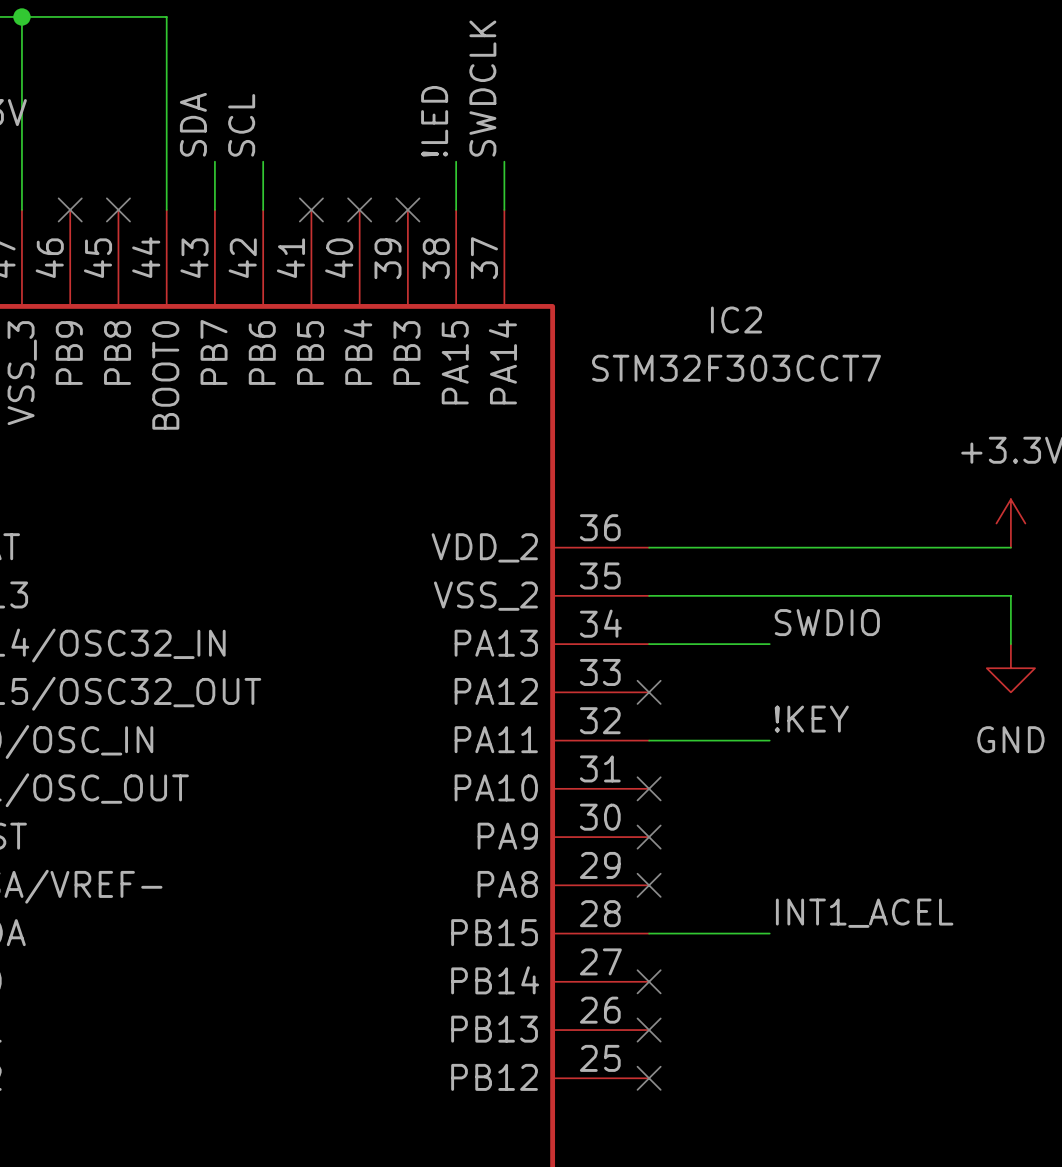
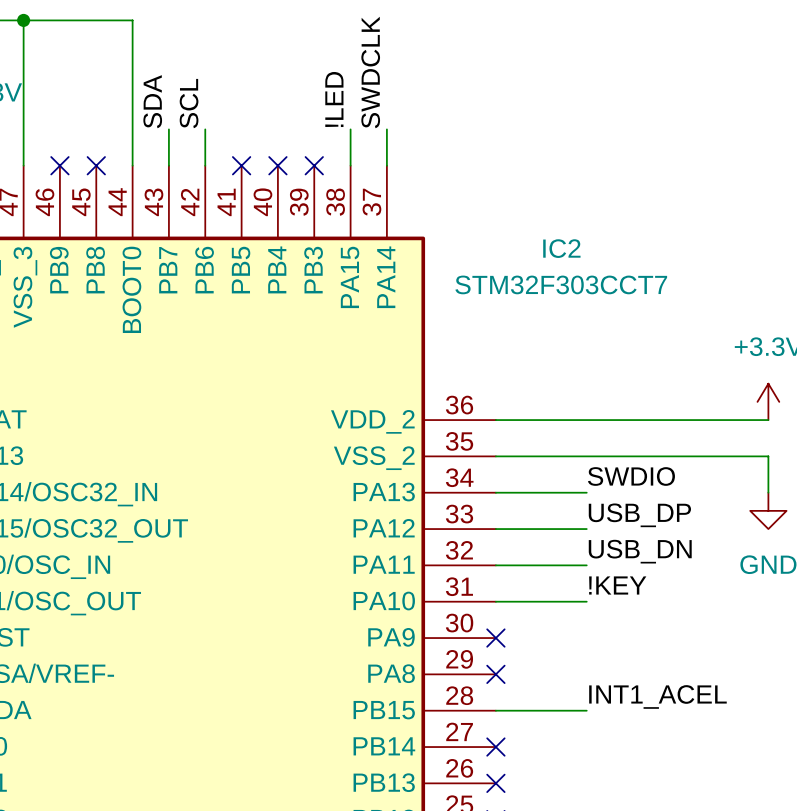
label: none -> USB_DP (639, 515)
wire: none -> (495, 529) (586, 529)
no-connect mark: (649, 692) -> none
label: !KEY (811, 719) -> USB_DN (640, 551)
label: none -> !KEY (617, 585)
wire: none -> (495, 601) (586, 601)
no-connect mark: (649, 788) -> none

